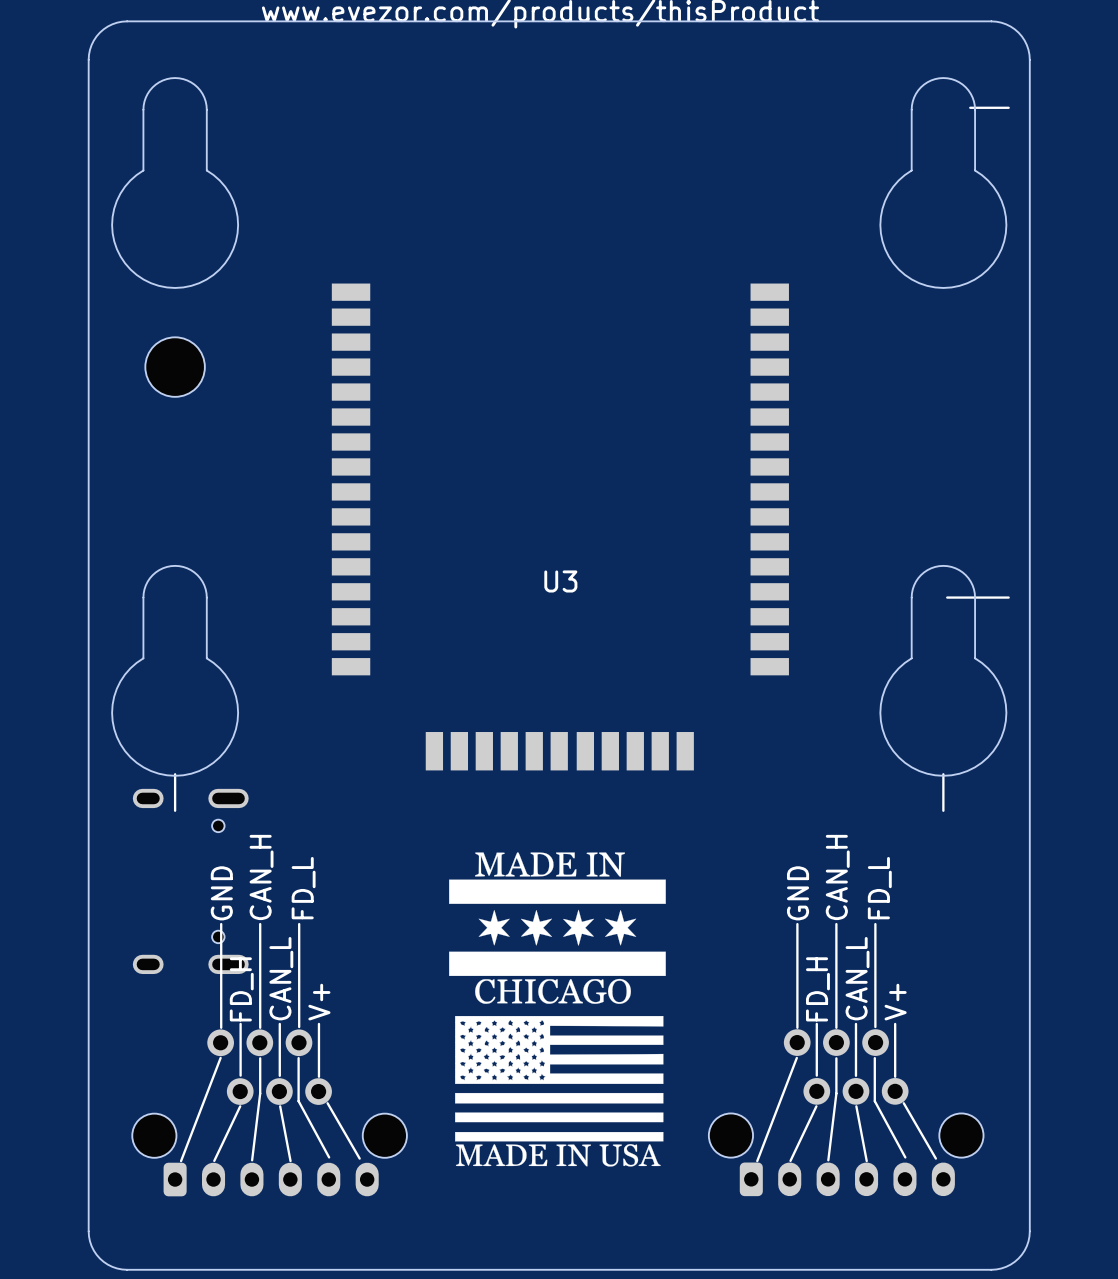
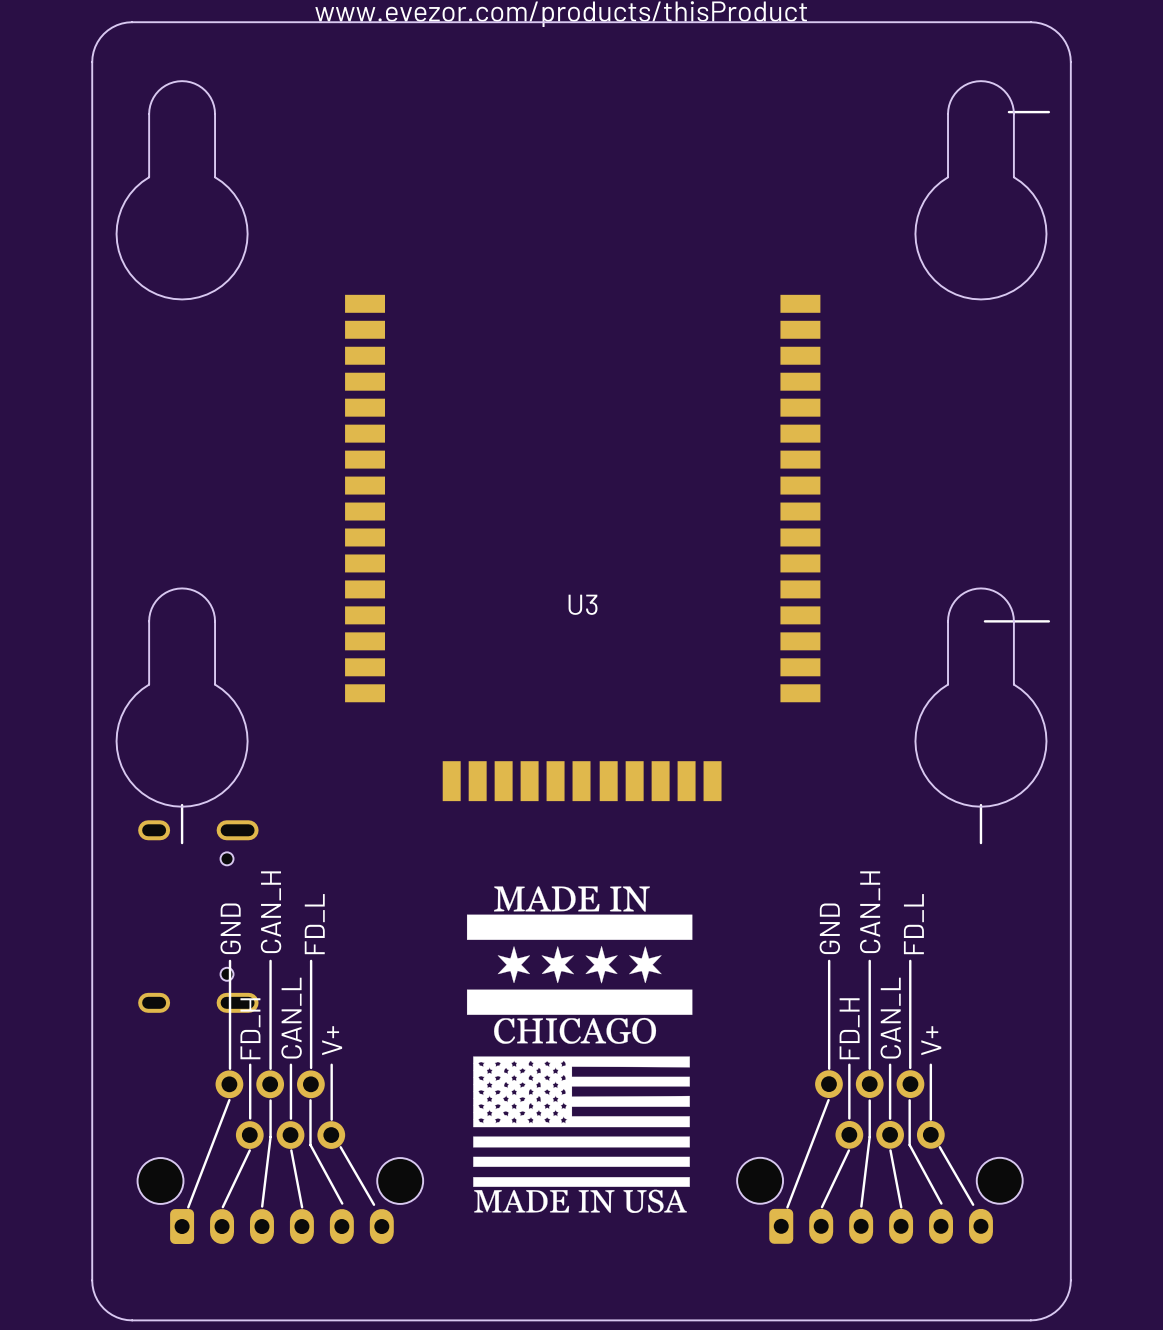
part: (175, 367) -> none

